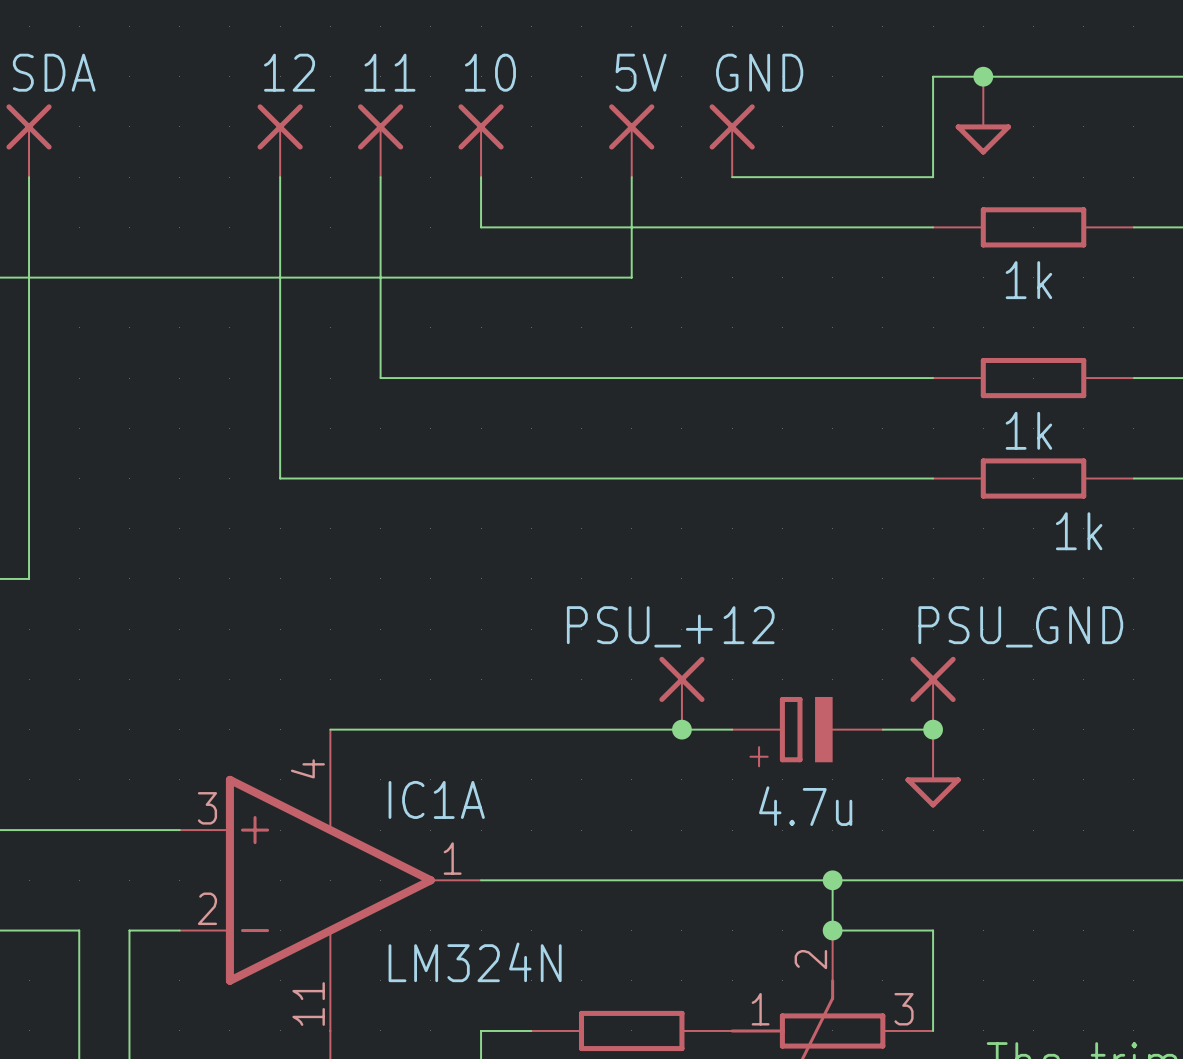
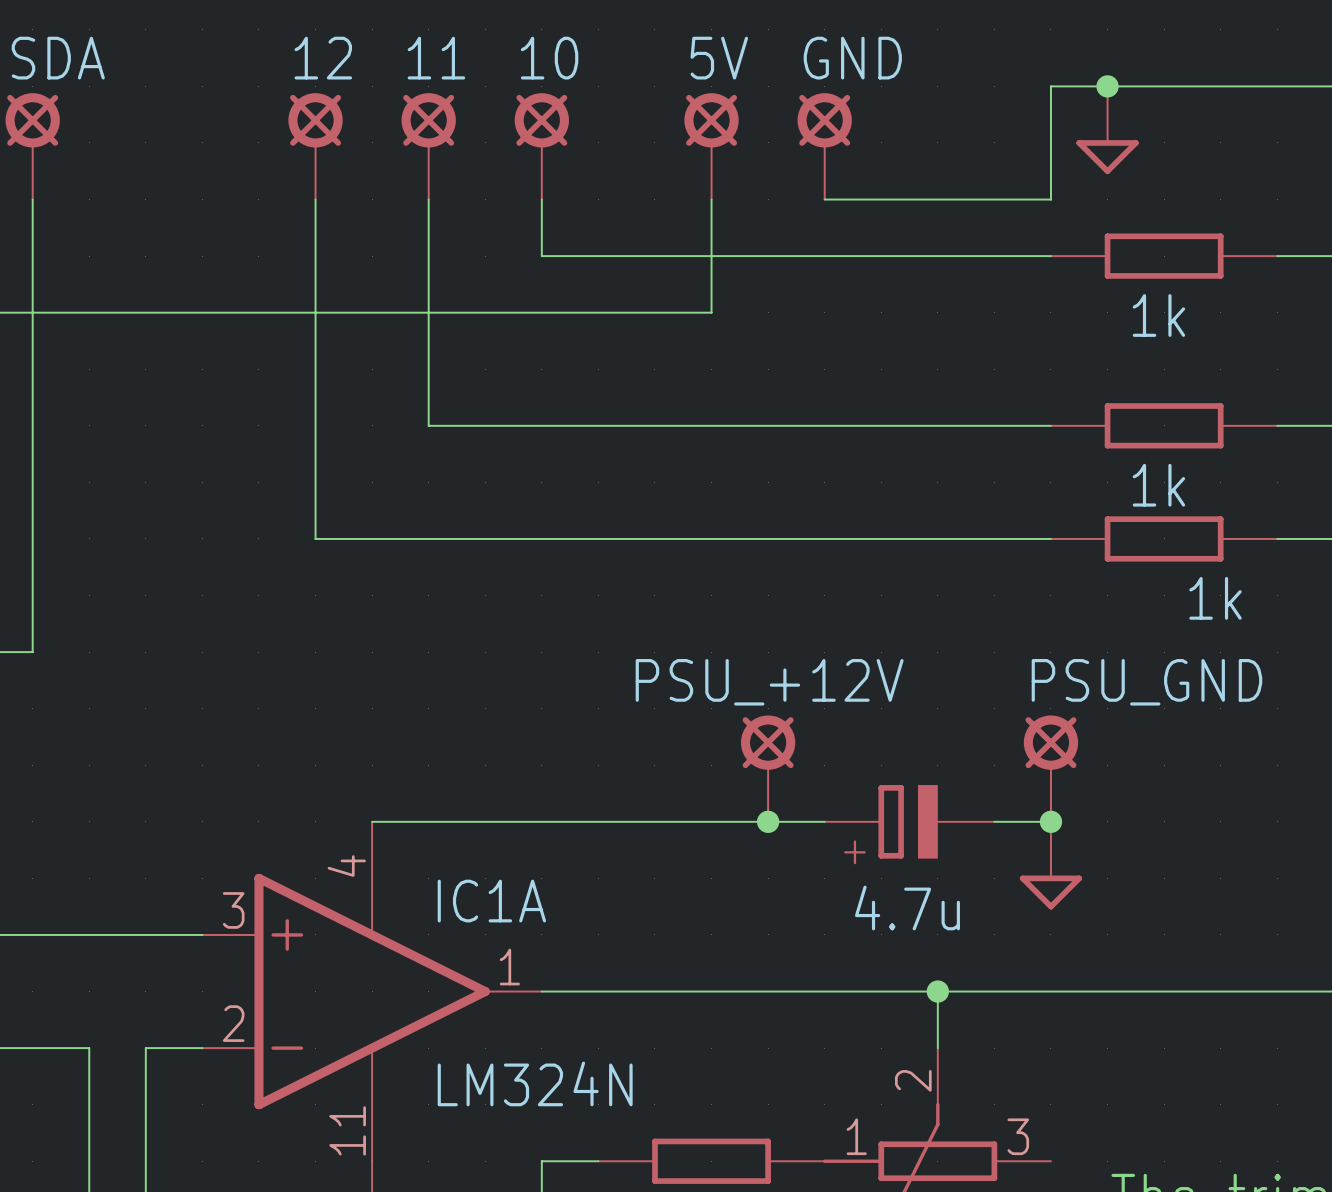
SDA symbol: [6, 104, 52, 178] -> [5, 93, 60, 200]
12 symbol: [257, 104, 303, 178] -> [288, 93, 343, 200]
11 symbol: [358, 104, 404, 178] -> [401, 93, 456, 200]
10 symbol: [458, 104, 504, 178] -> [514, 93, 569, 200]
5V symbol: [609, 104, 655, 178] -> [684, 93, 739, 200]
GND symbol: [709, 104, 755, 178] -> [797, 93, 852, 200]
PSU_GND symbol: [910, 656, 956, 730] -> [1023, 715, 1079, 822]
PSU_+12V: none -> (768, 768)
PSU_+12: (681, 693) -> none
wire: (832, 930) (933, 930) (933, 1030) -> none
junction: (832, 930) -> none

